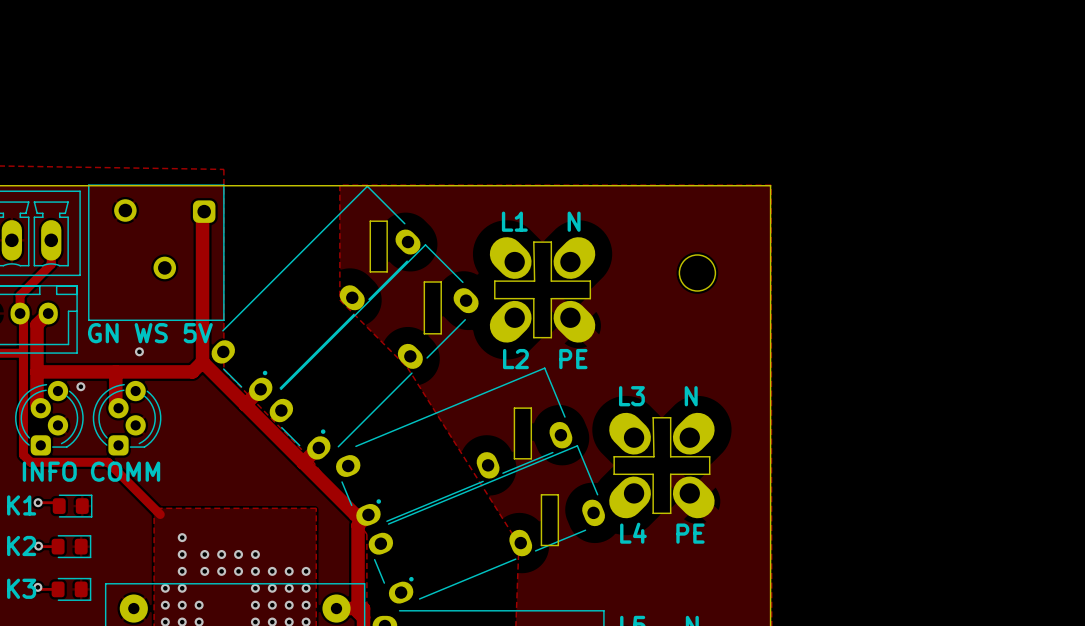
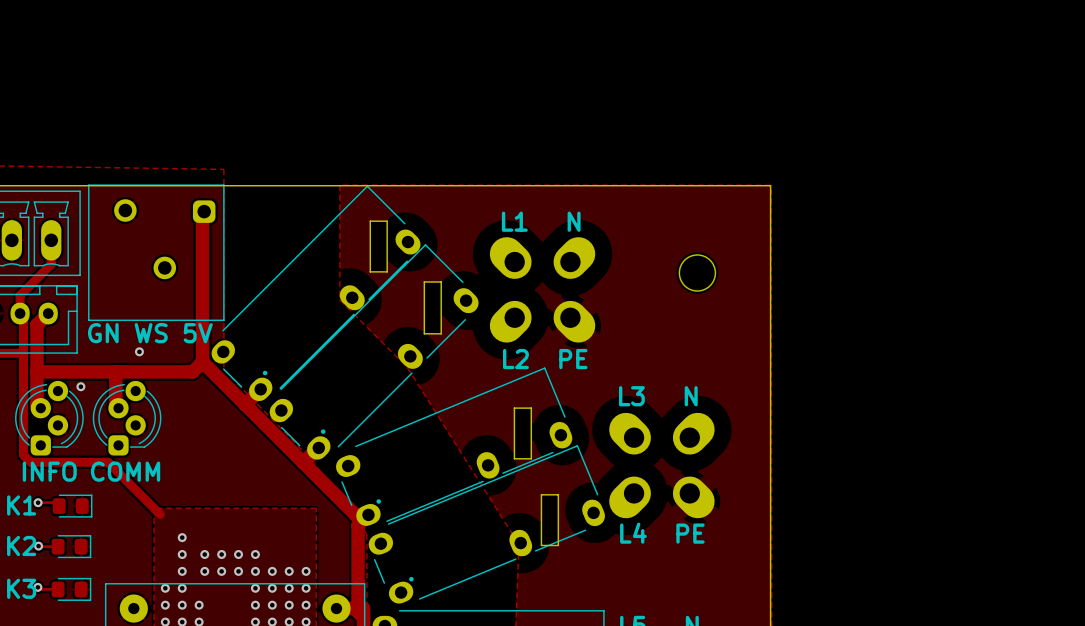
part footprint: [489, 237, 596, 343] -> [489, 237, 596, 343]
part footprint: [609, 412, 715, 519] -> [609, 412, 715, 519]

